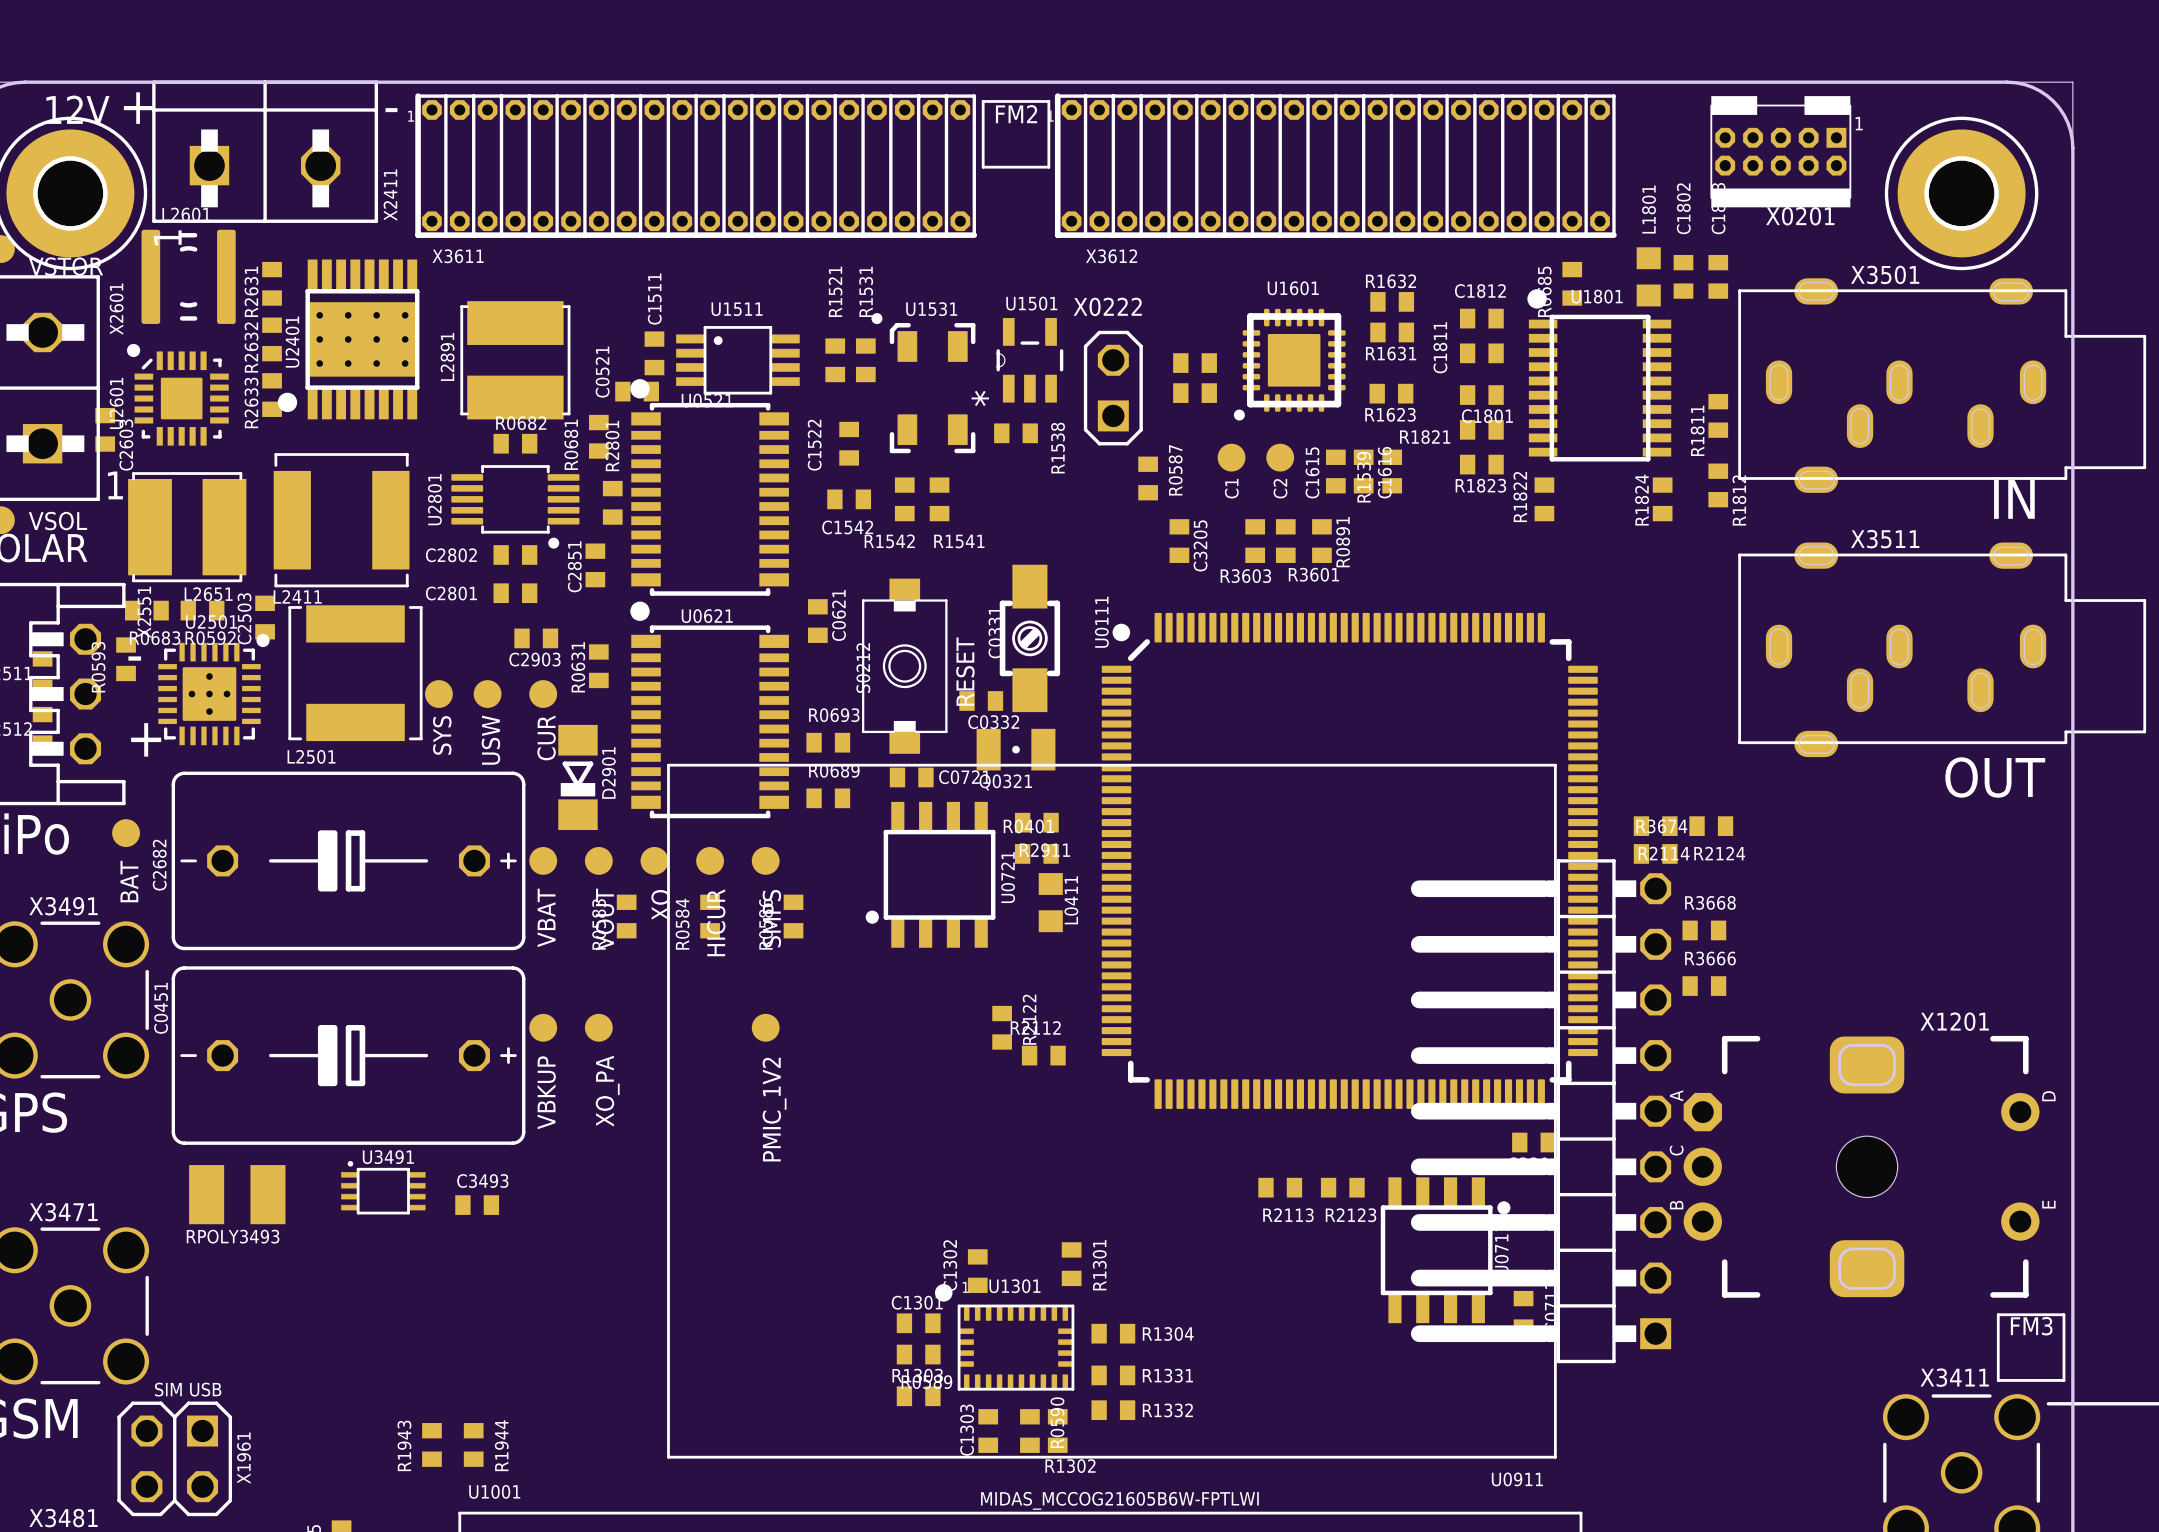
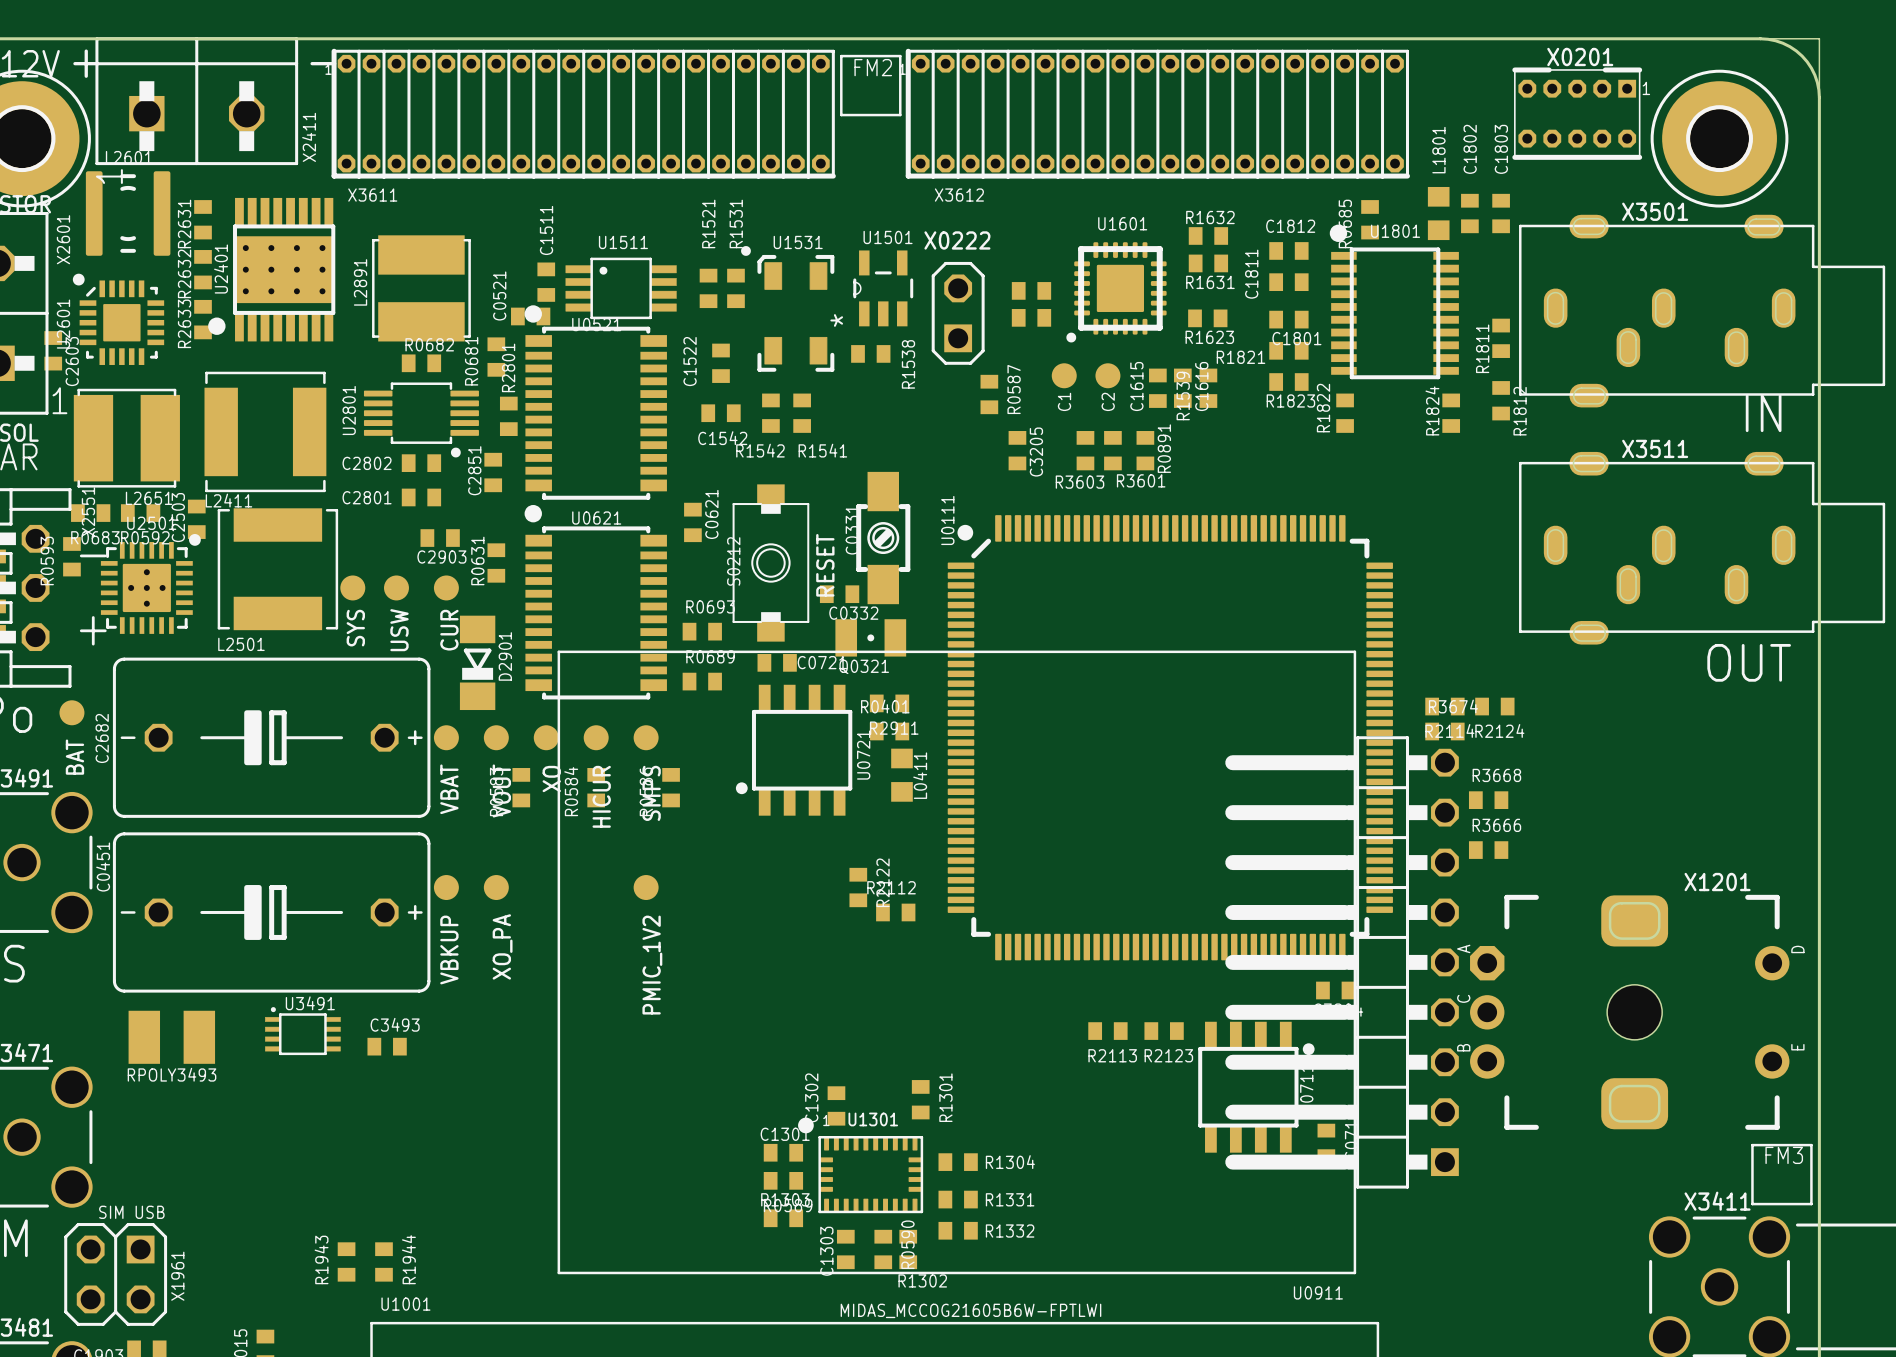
X0201 footprint: [1710, 96, 1852, 208] -> [1512, 67, 1643, 160]
X0201 name position: X0201 (1800, 216) -> X0201 (1580, 56)

